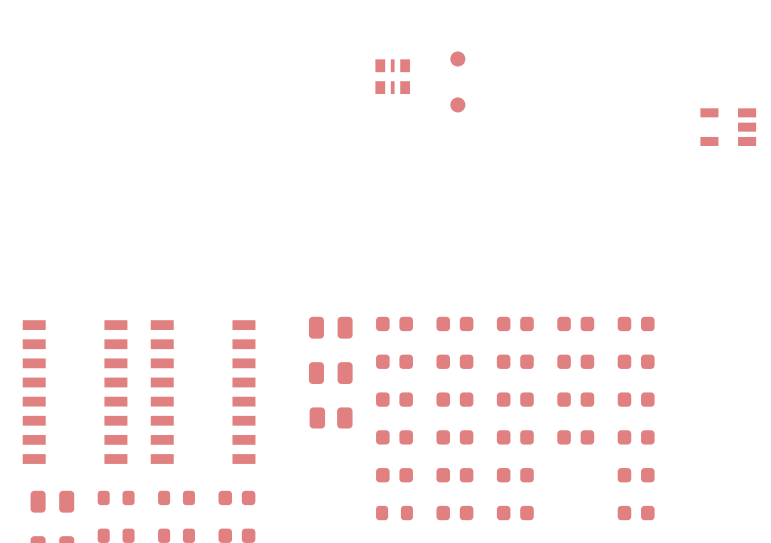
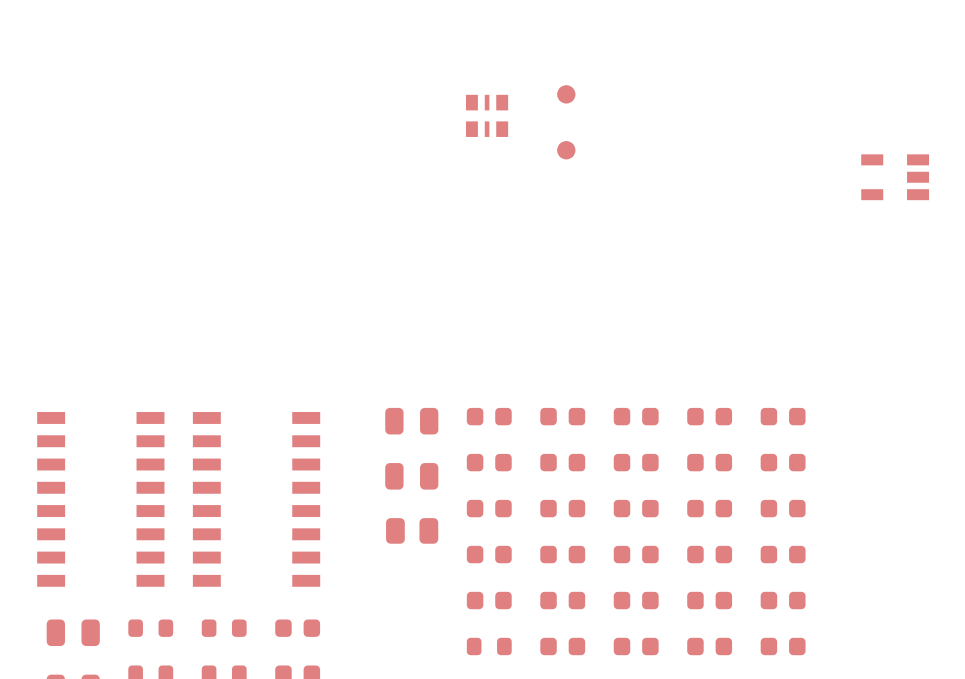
part: none -> (709, 600)
part: none -> (709, 646)

